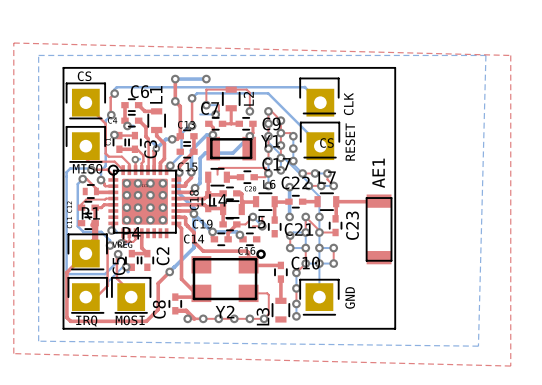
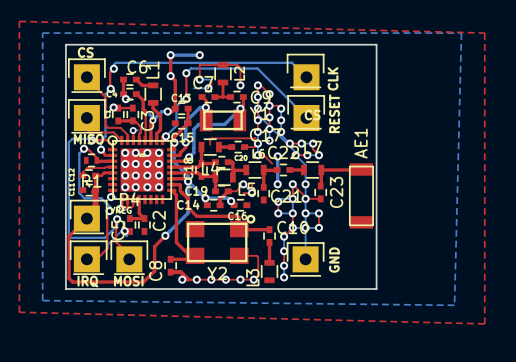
top track: none -> (257, 155) (263, 155) (272, 163)

